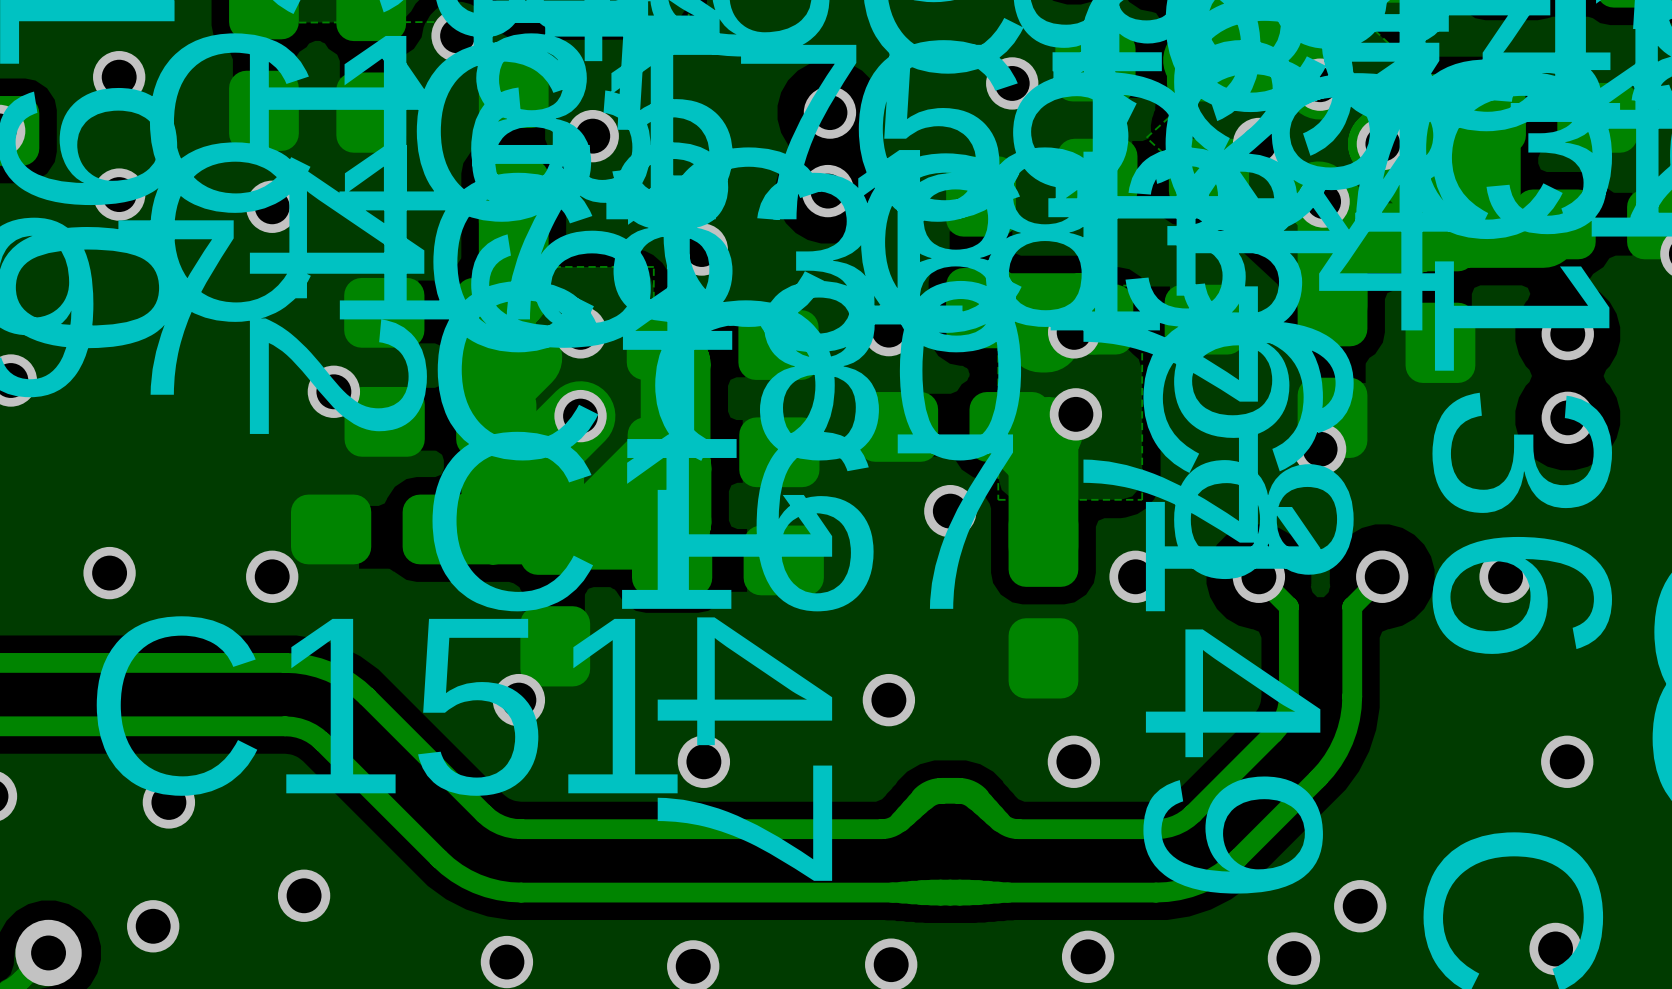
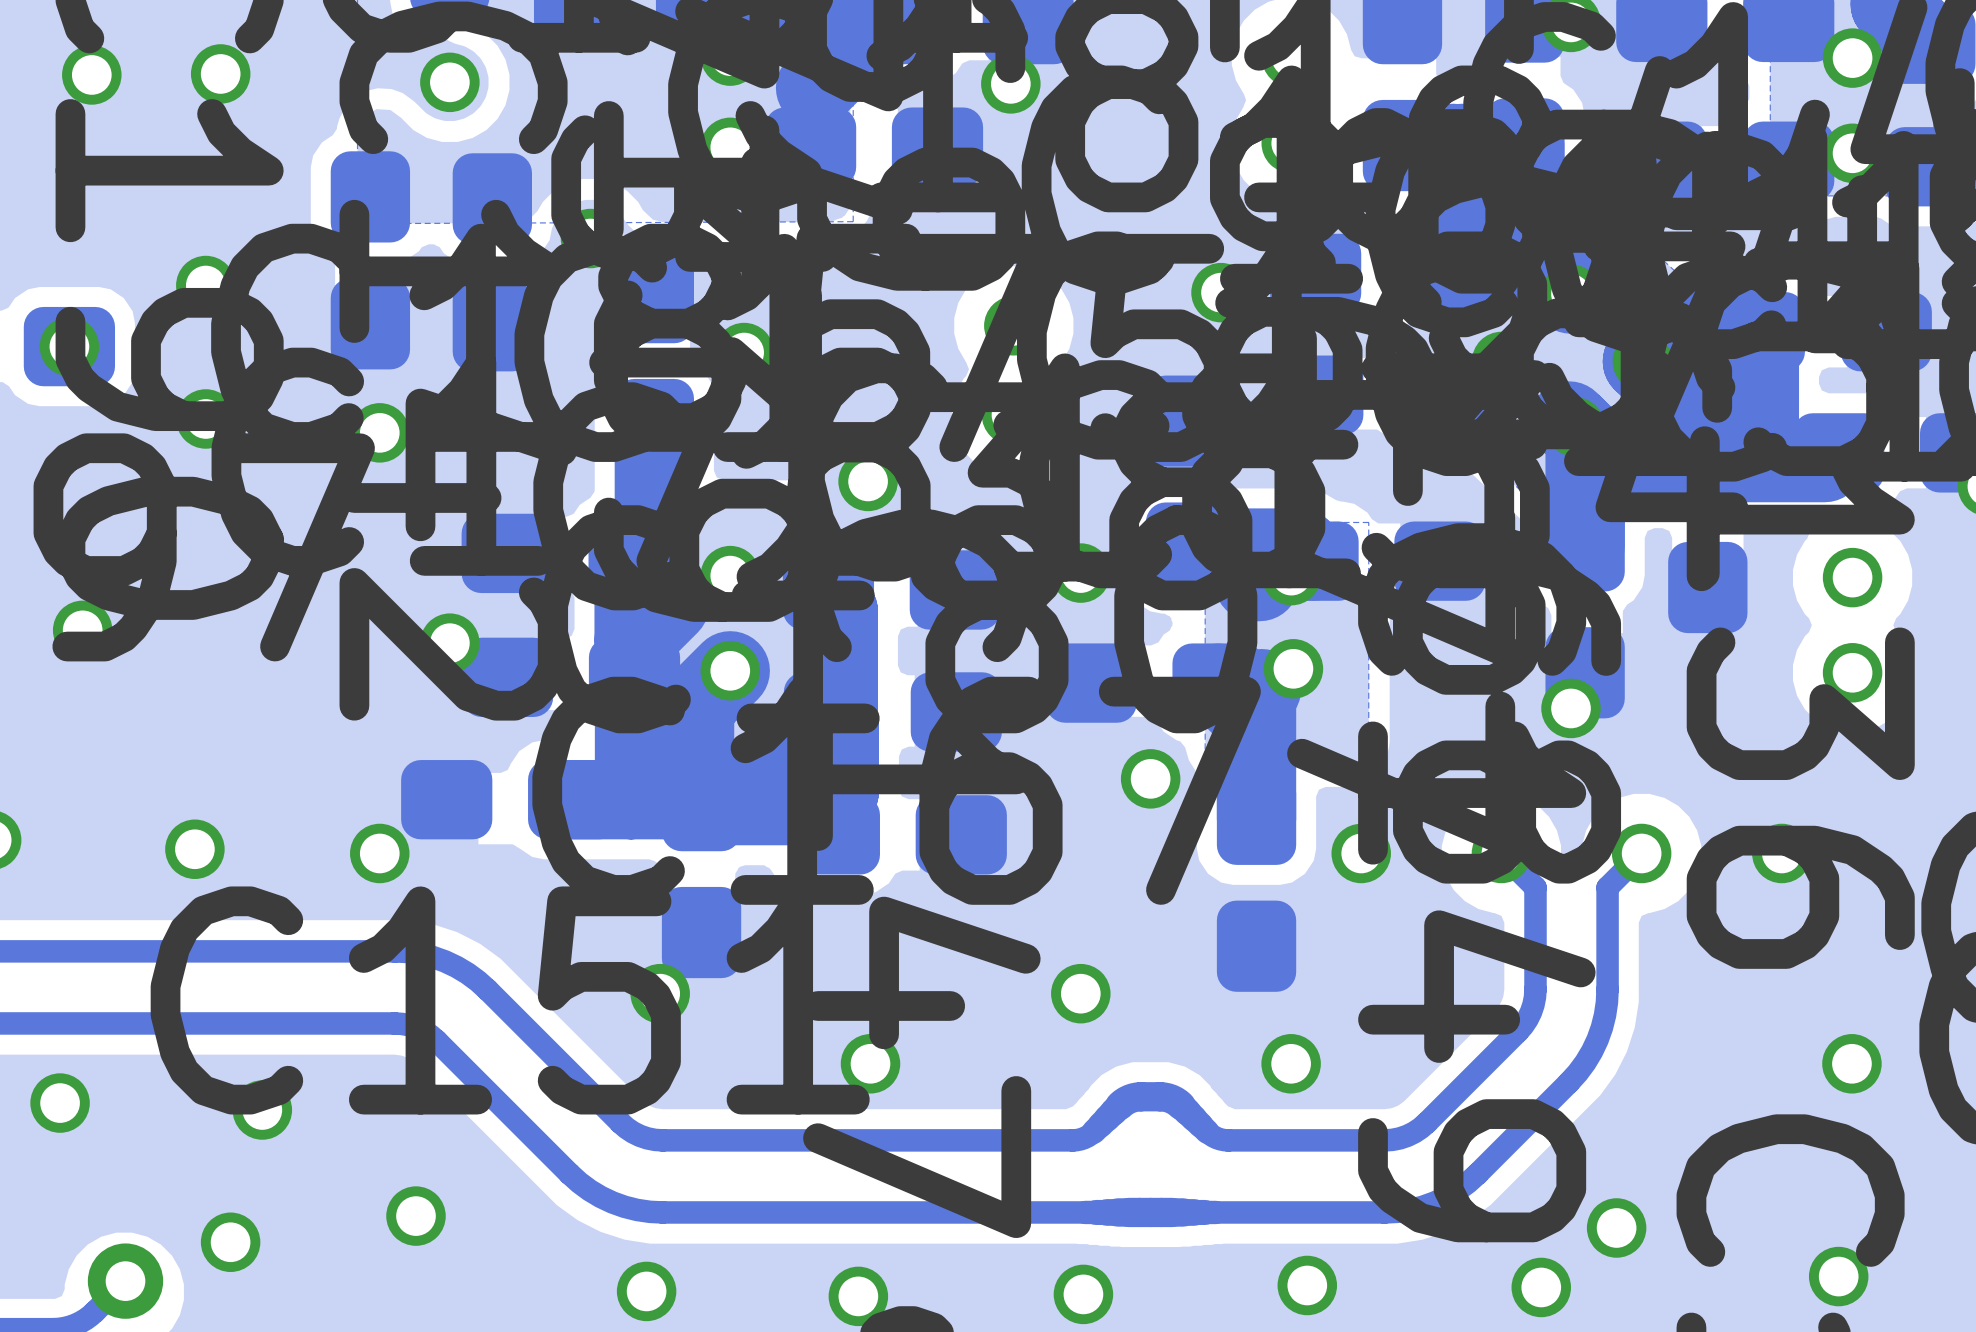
via position: (153, 926) -> (230, 1242)

